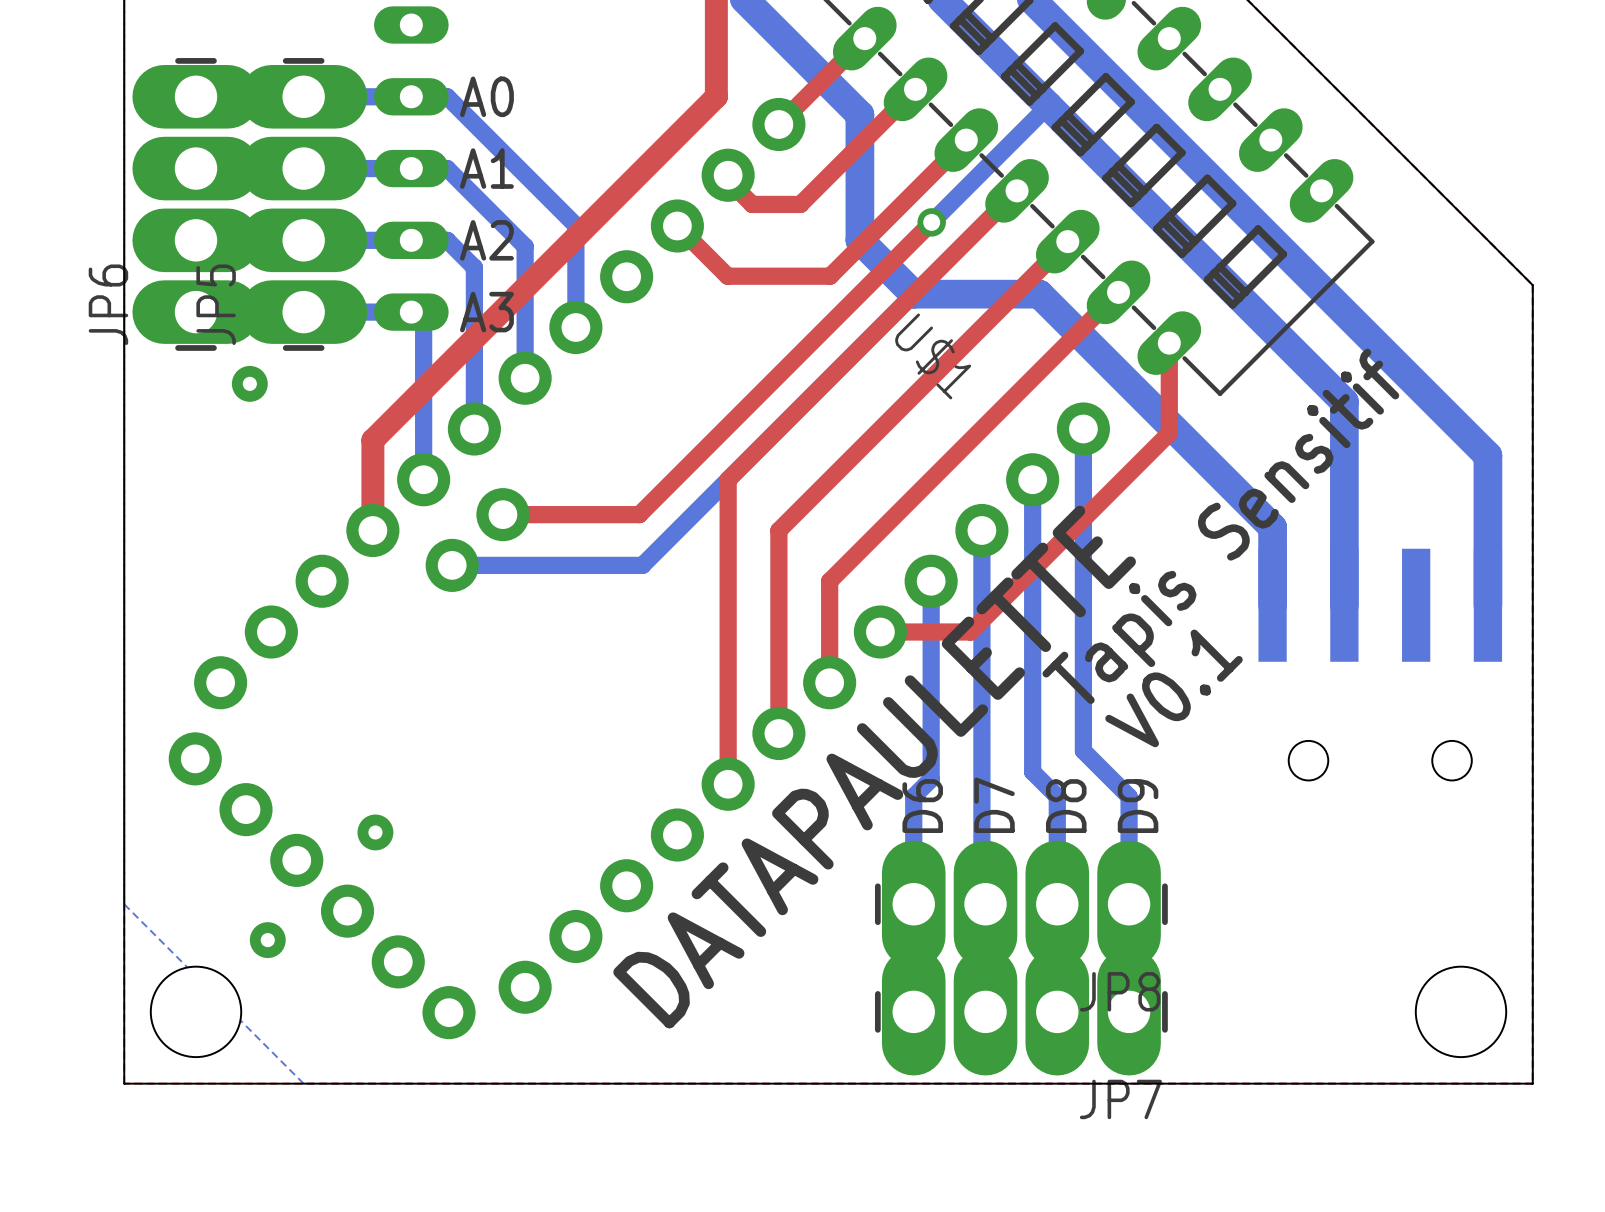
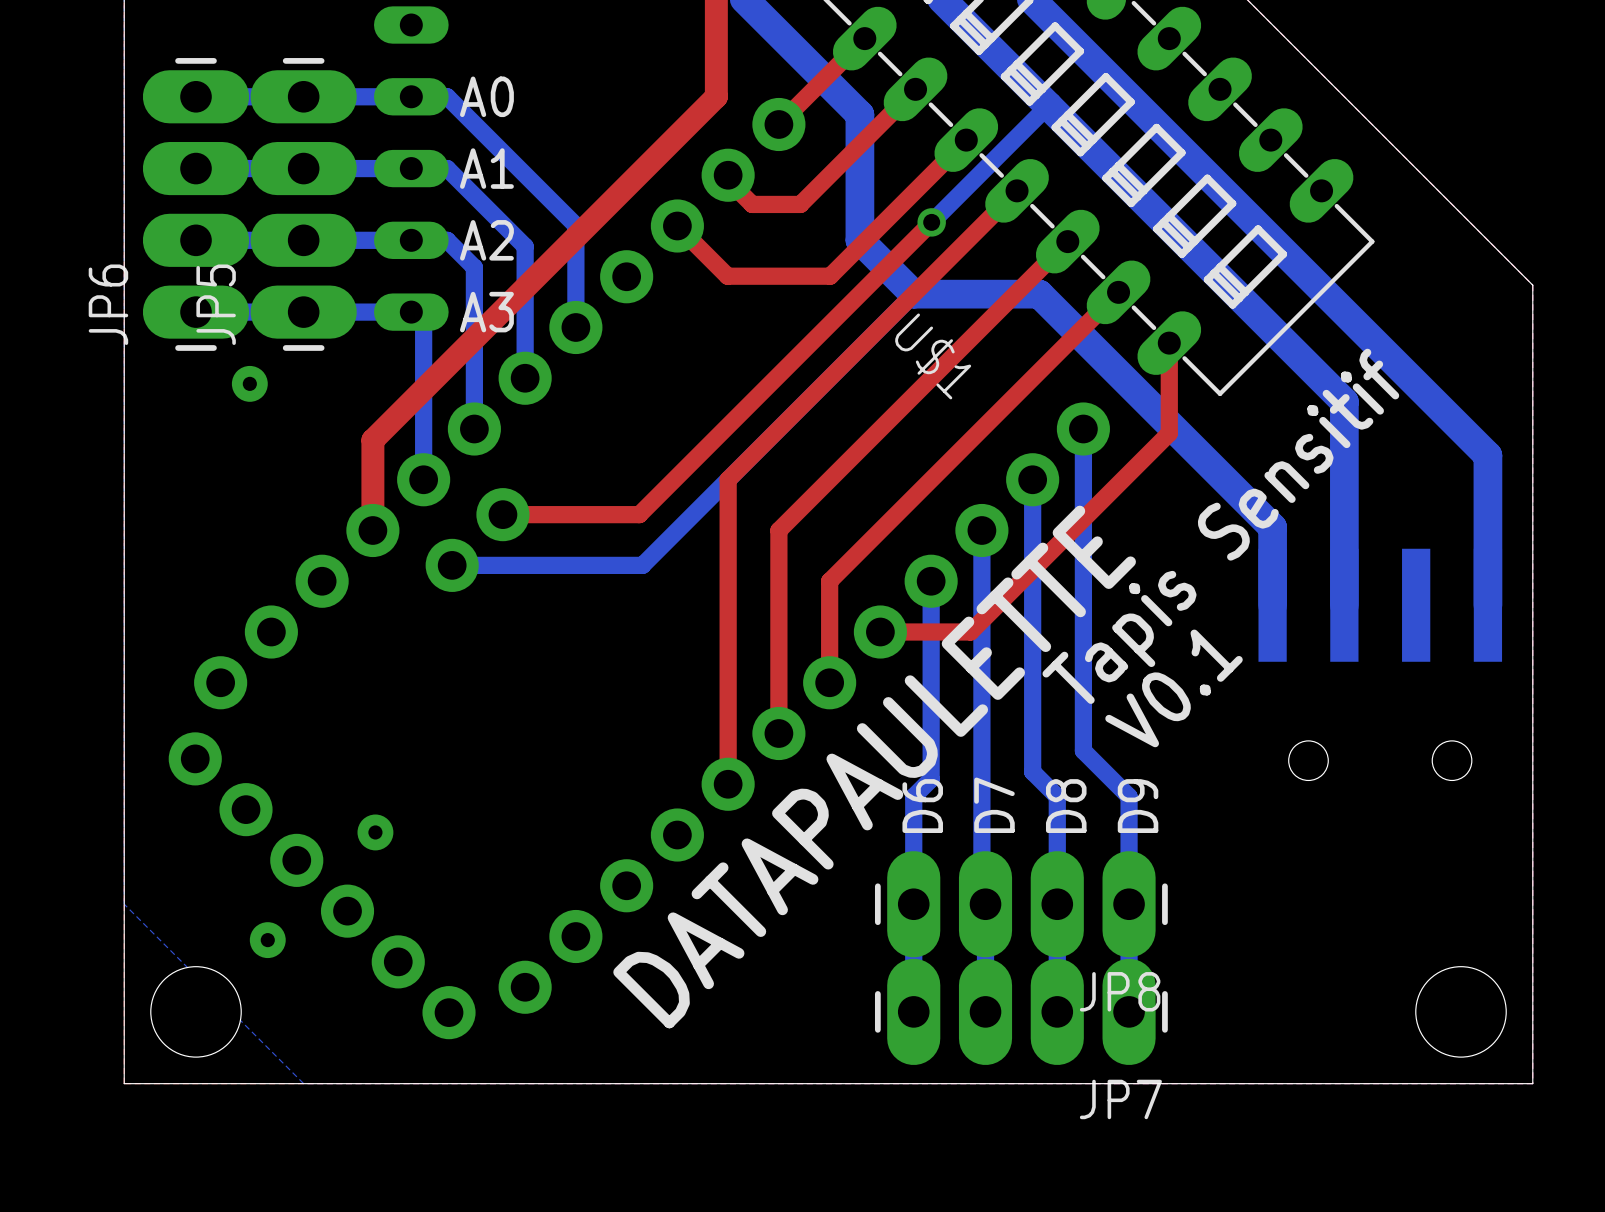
JP6 footprint: [132, 58, 260, 351] -> [142, 58, 250, 351]
JP5 footprint: [240, 58, 368, 351] -> [250, 58, 357, 351]
JP8 footprint: [874, 840, 1168, 968] -> [874, 851, 1168, 958]
JP7 footprint: [874, 948, 1168, 1076] -> [874, 958, 1168, 1066]

